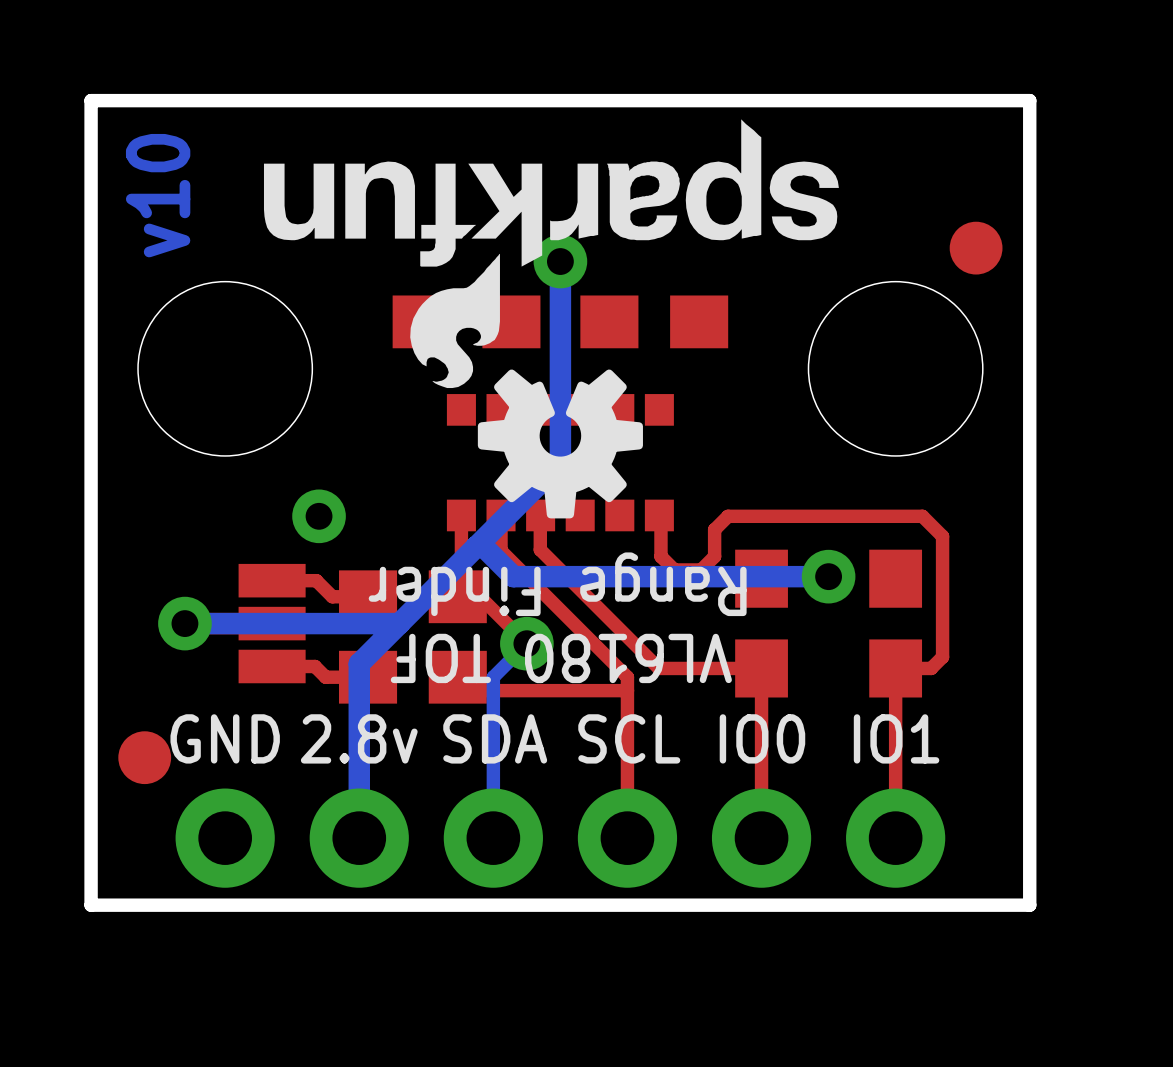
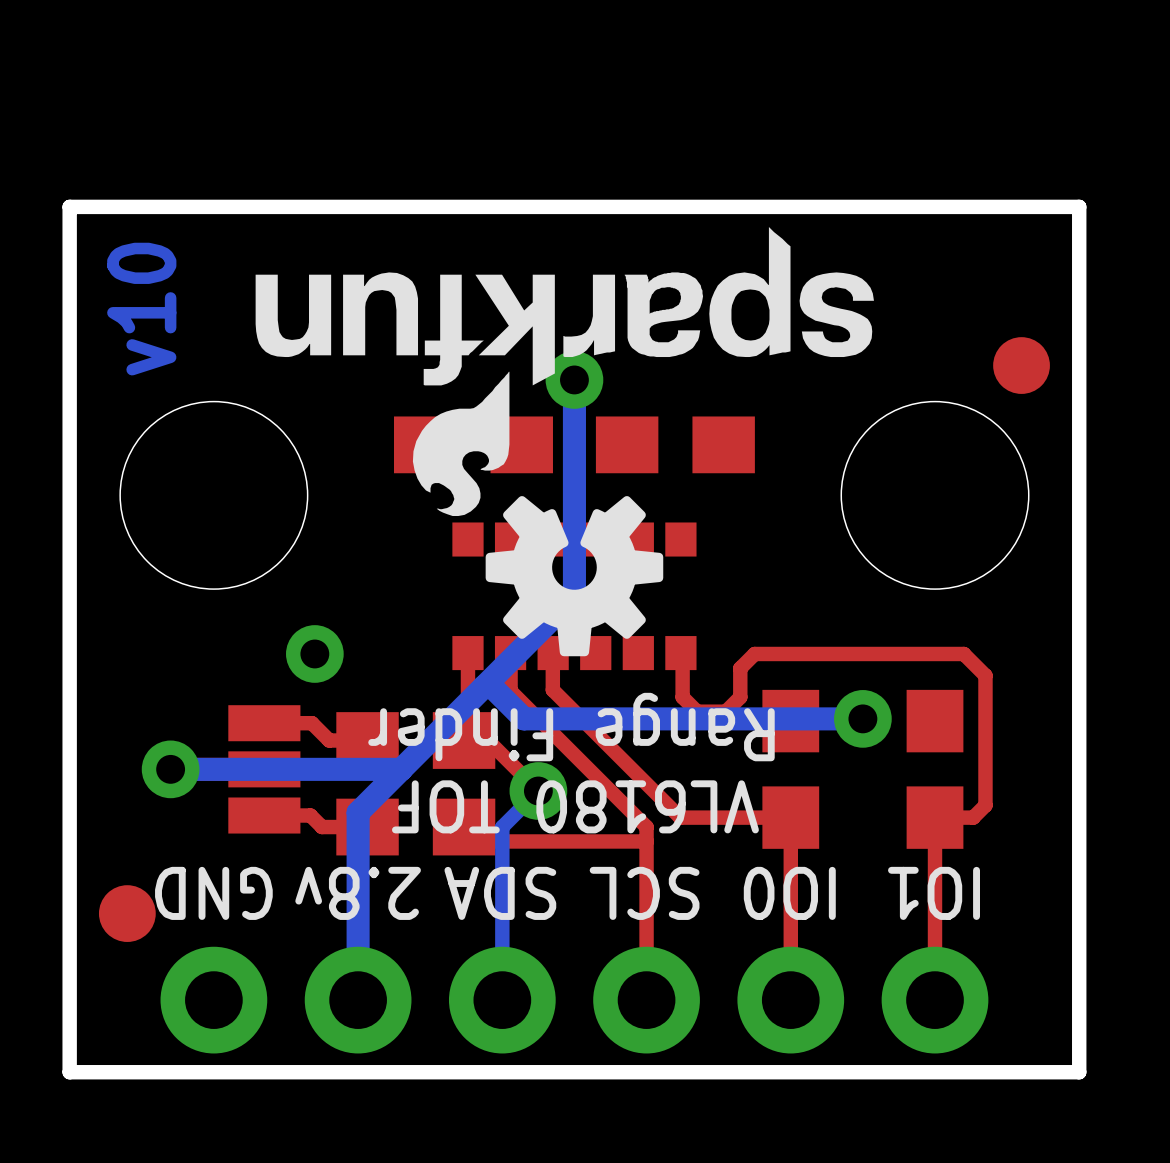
text rotation: 0° (225, 738) -> 180° (213, 893)
text rotation: 0° (359, 738) -> 180° (358, 893)
text rotation: 0° (495, 738) -> 180° (500, 893)
text rotation: 0° (629, 738) -> 180° (644, 893)
text rotation: 0° (762, 738) -> 180° (789, 893)
text rotation: 0° (896, 738) -> 180° (934, 893)

